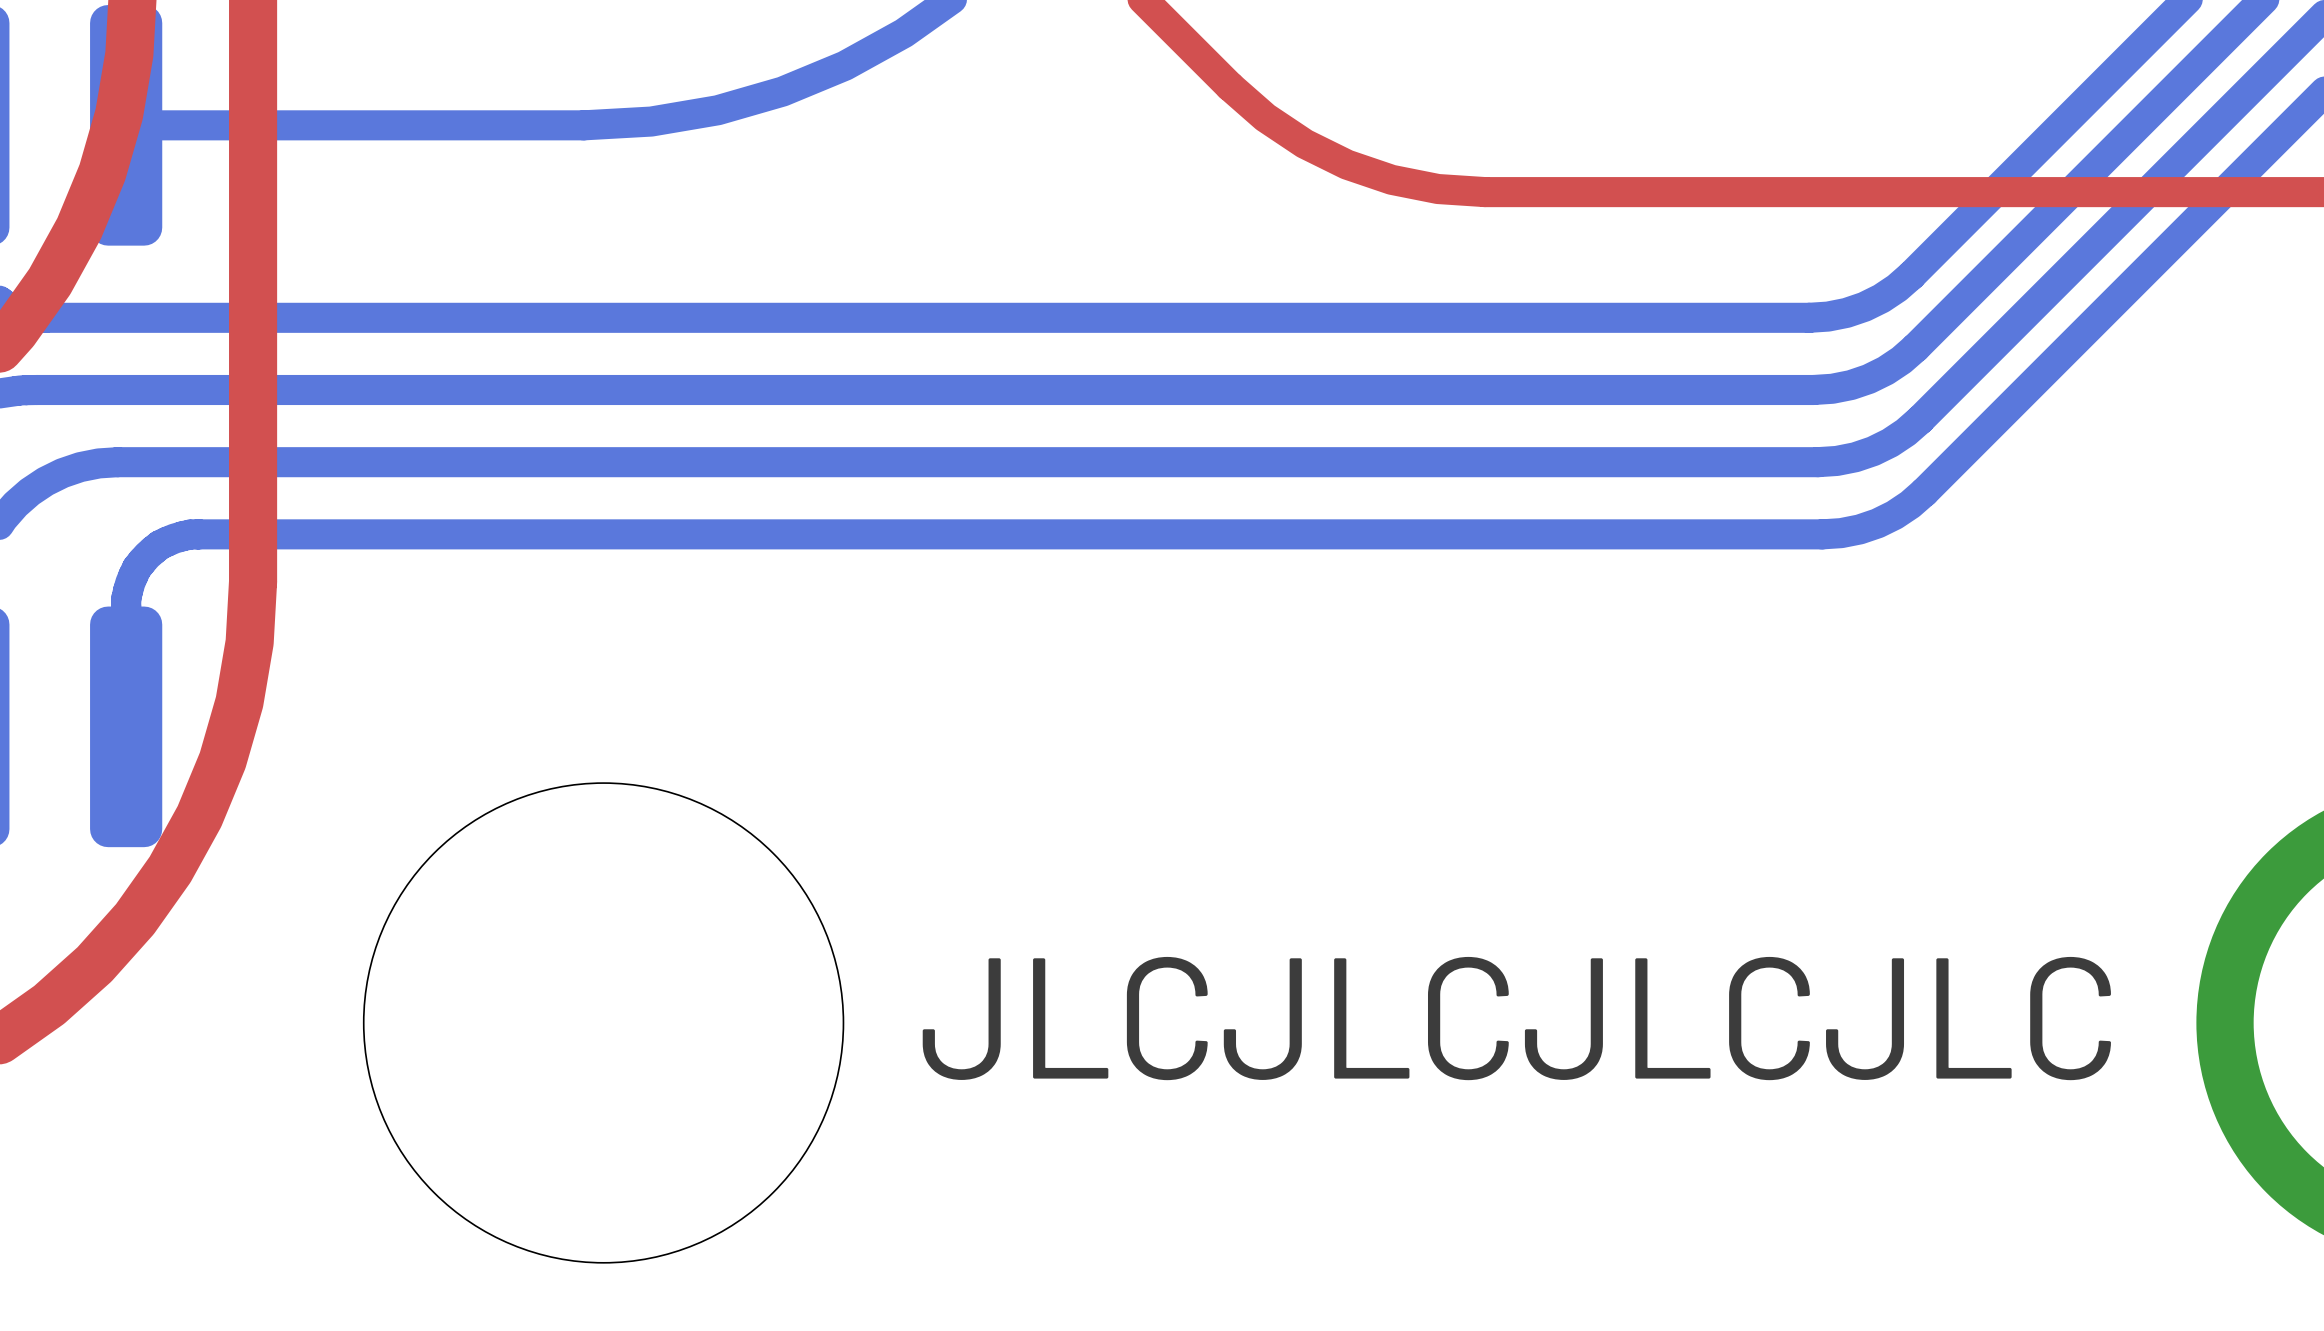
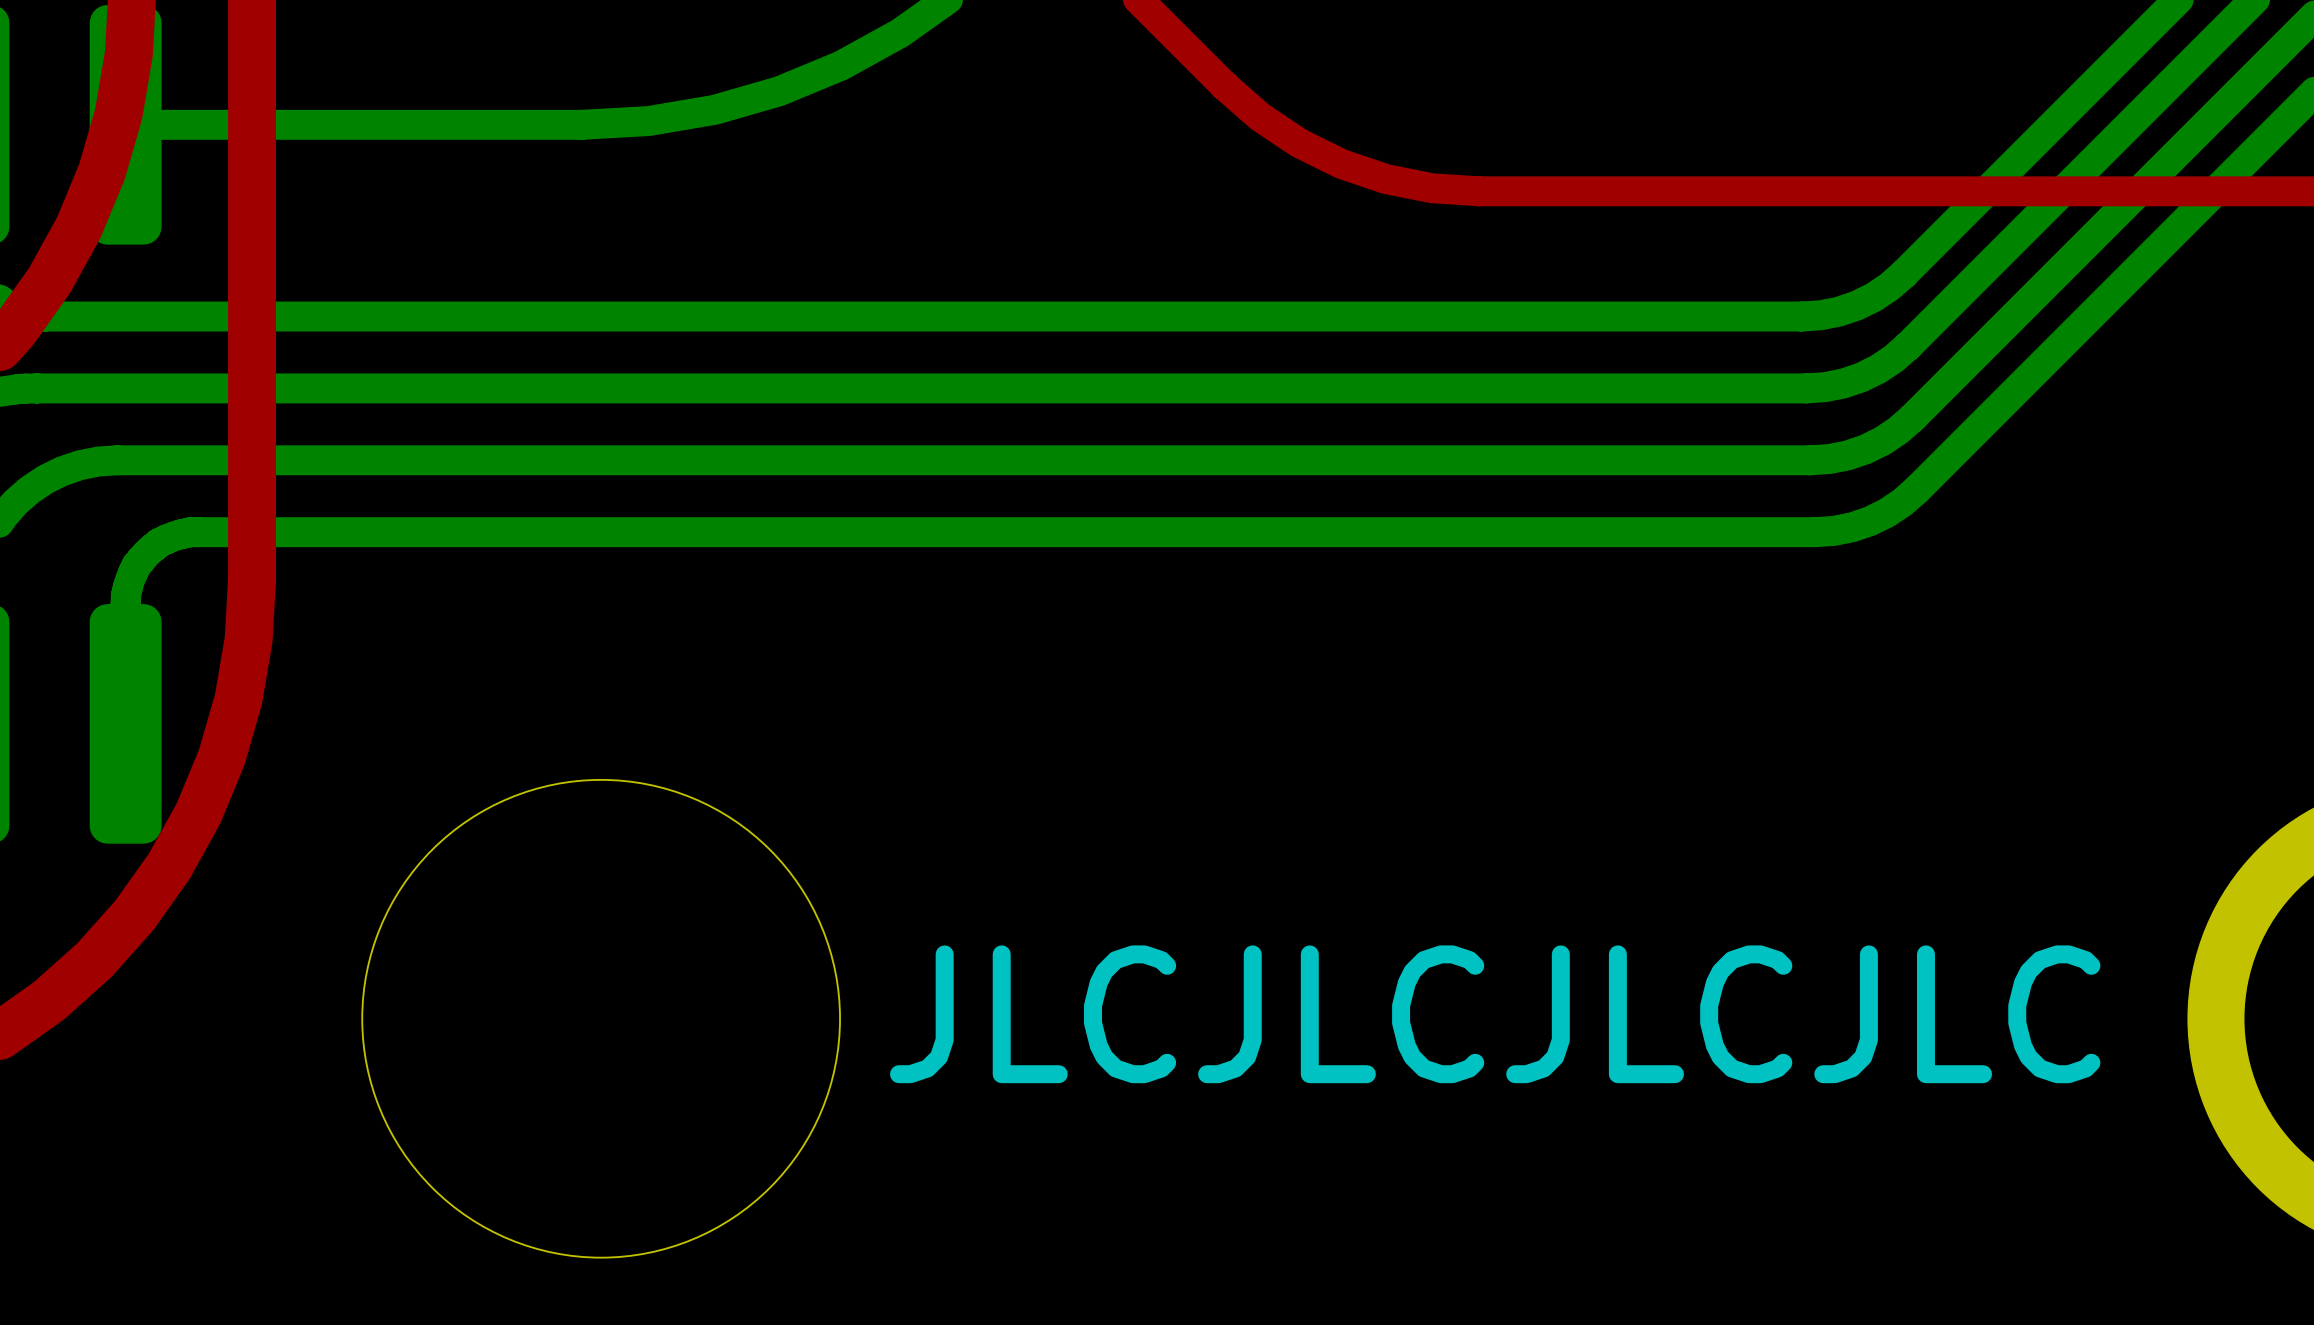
text position: JLCJLCJLCJLC (1516, 1018) -> JLCJLCJLCJLC (1495, 1014)

